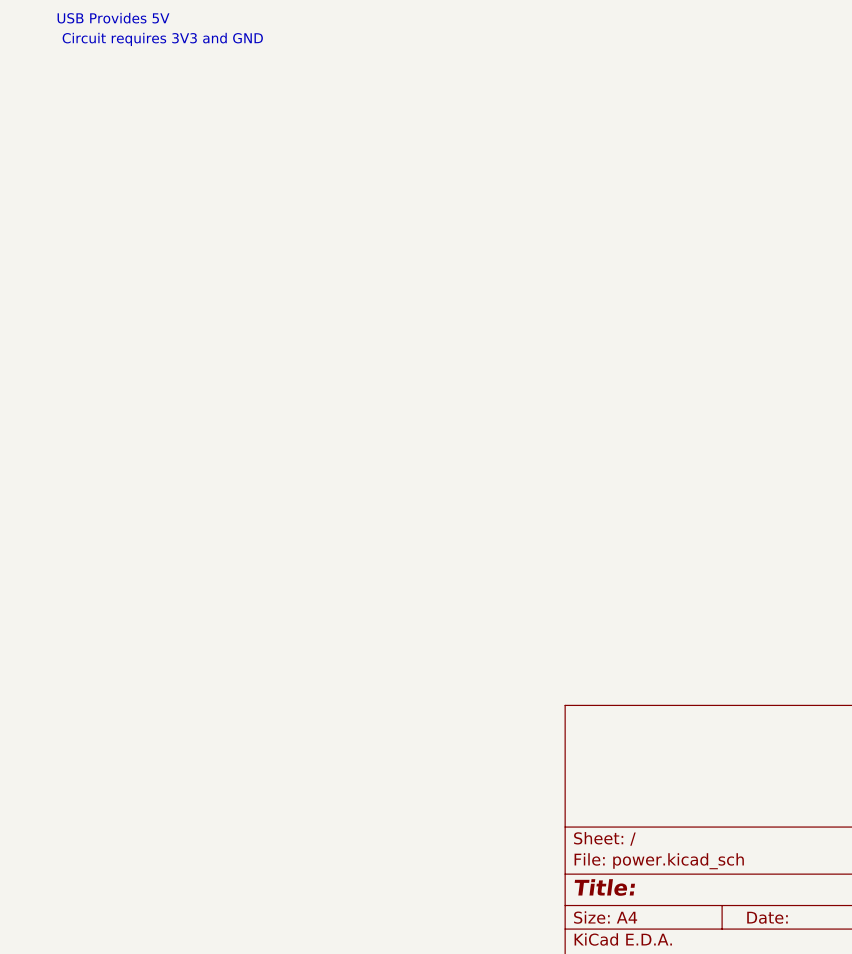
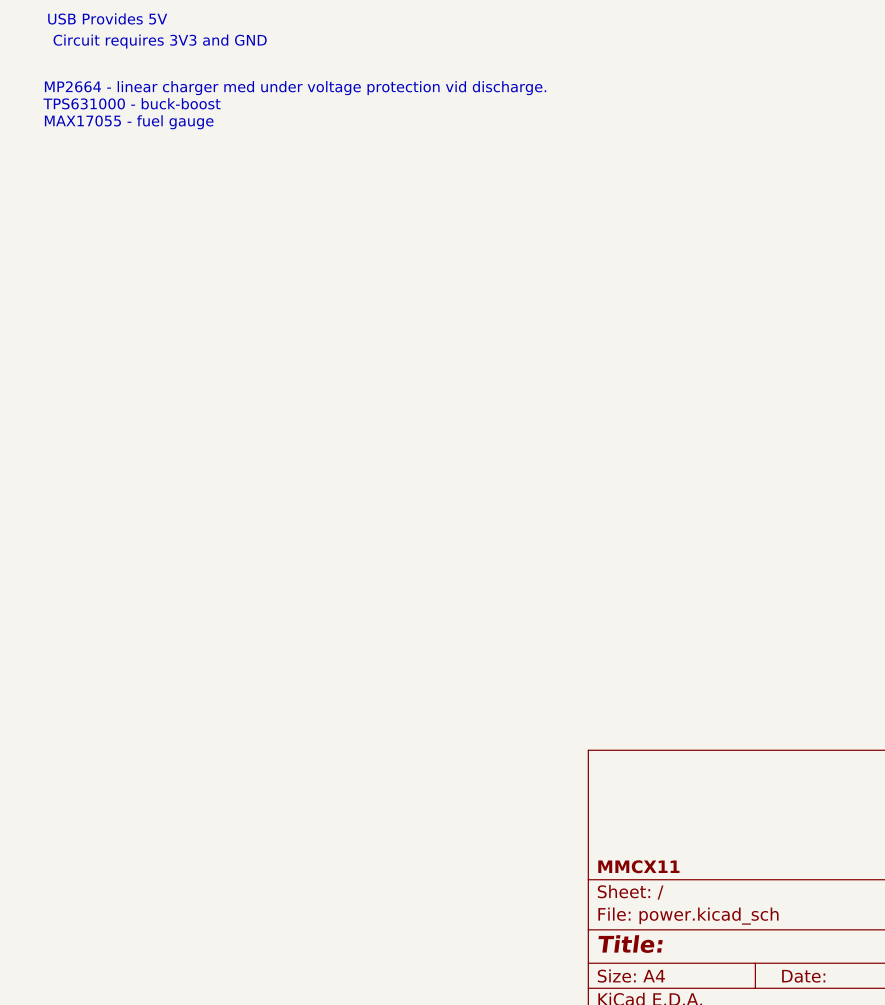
text: none -> MP2664 - linear charger med under voltage protection vid discharge. (295, 88)
text: none -> TPS631000 - buck-boost (131, 103)
text: none -> MAX17055 - fuel gauge (129, 122)
title block: none -> MMCX11 (638, 866)

